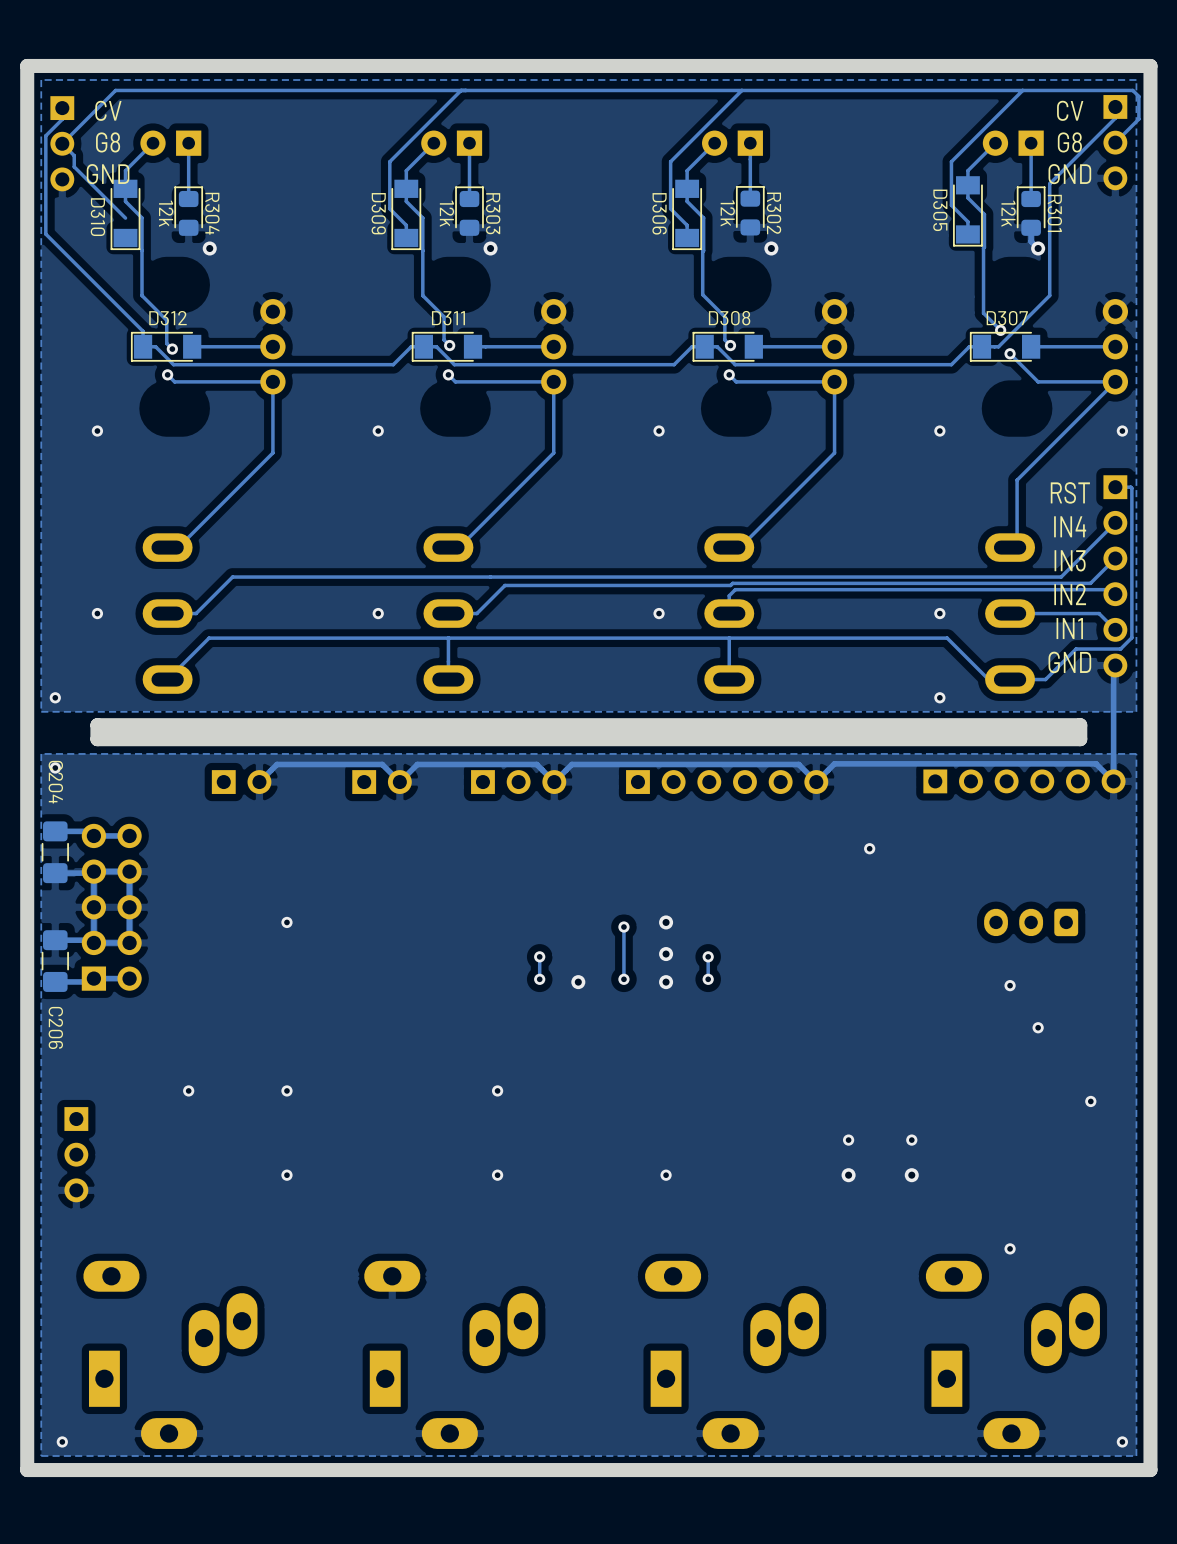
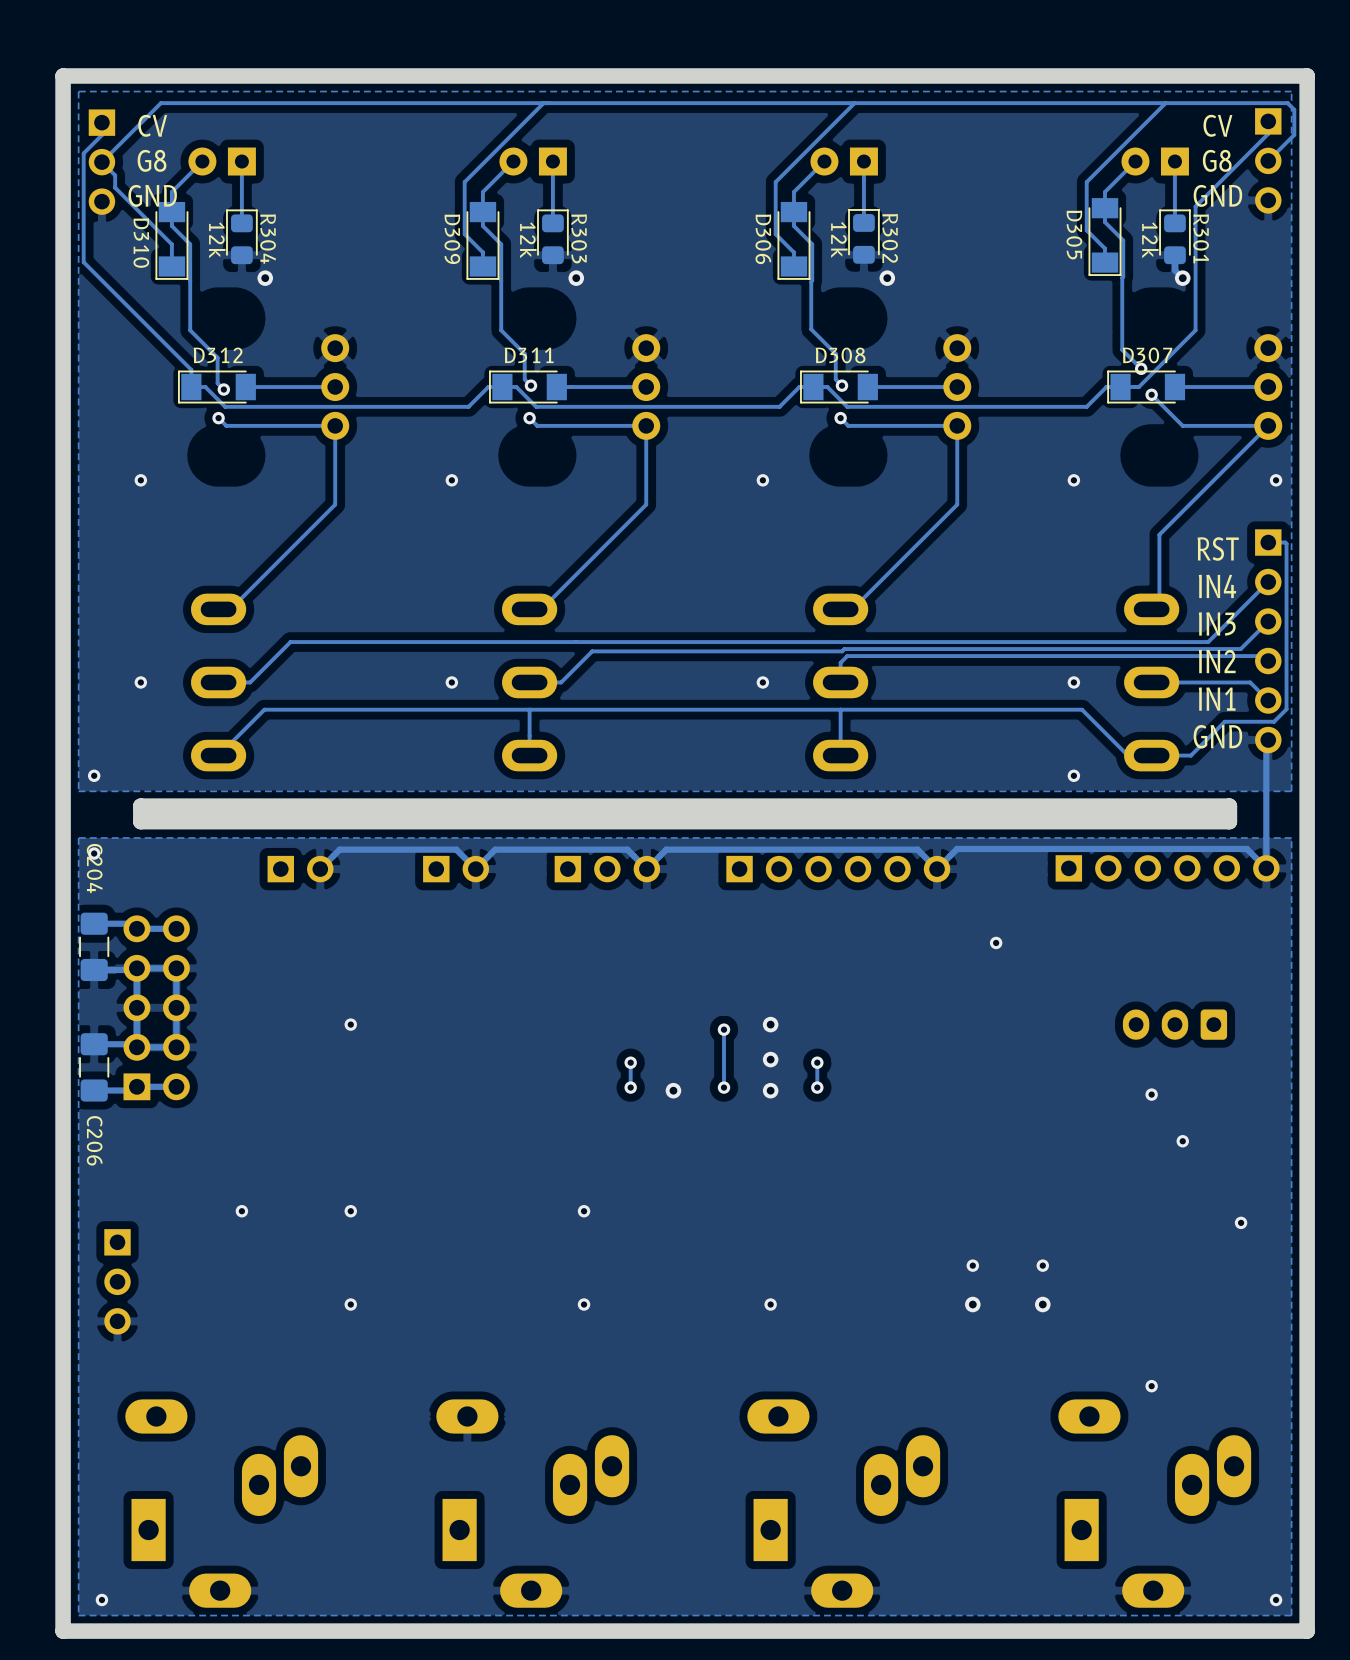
track: none -> (171, 244) (171, 266)

